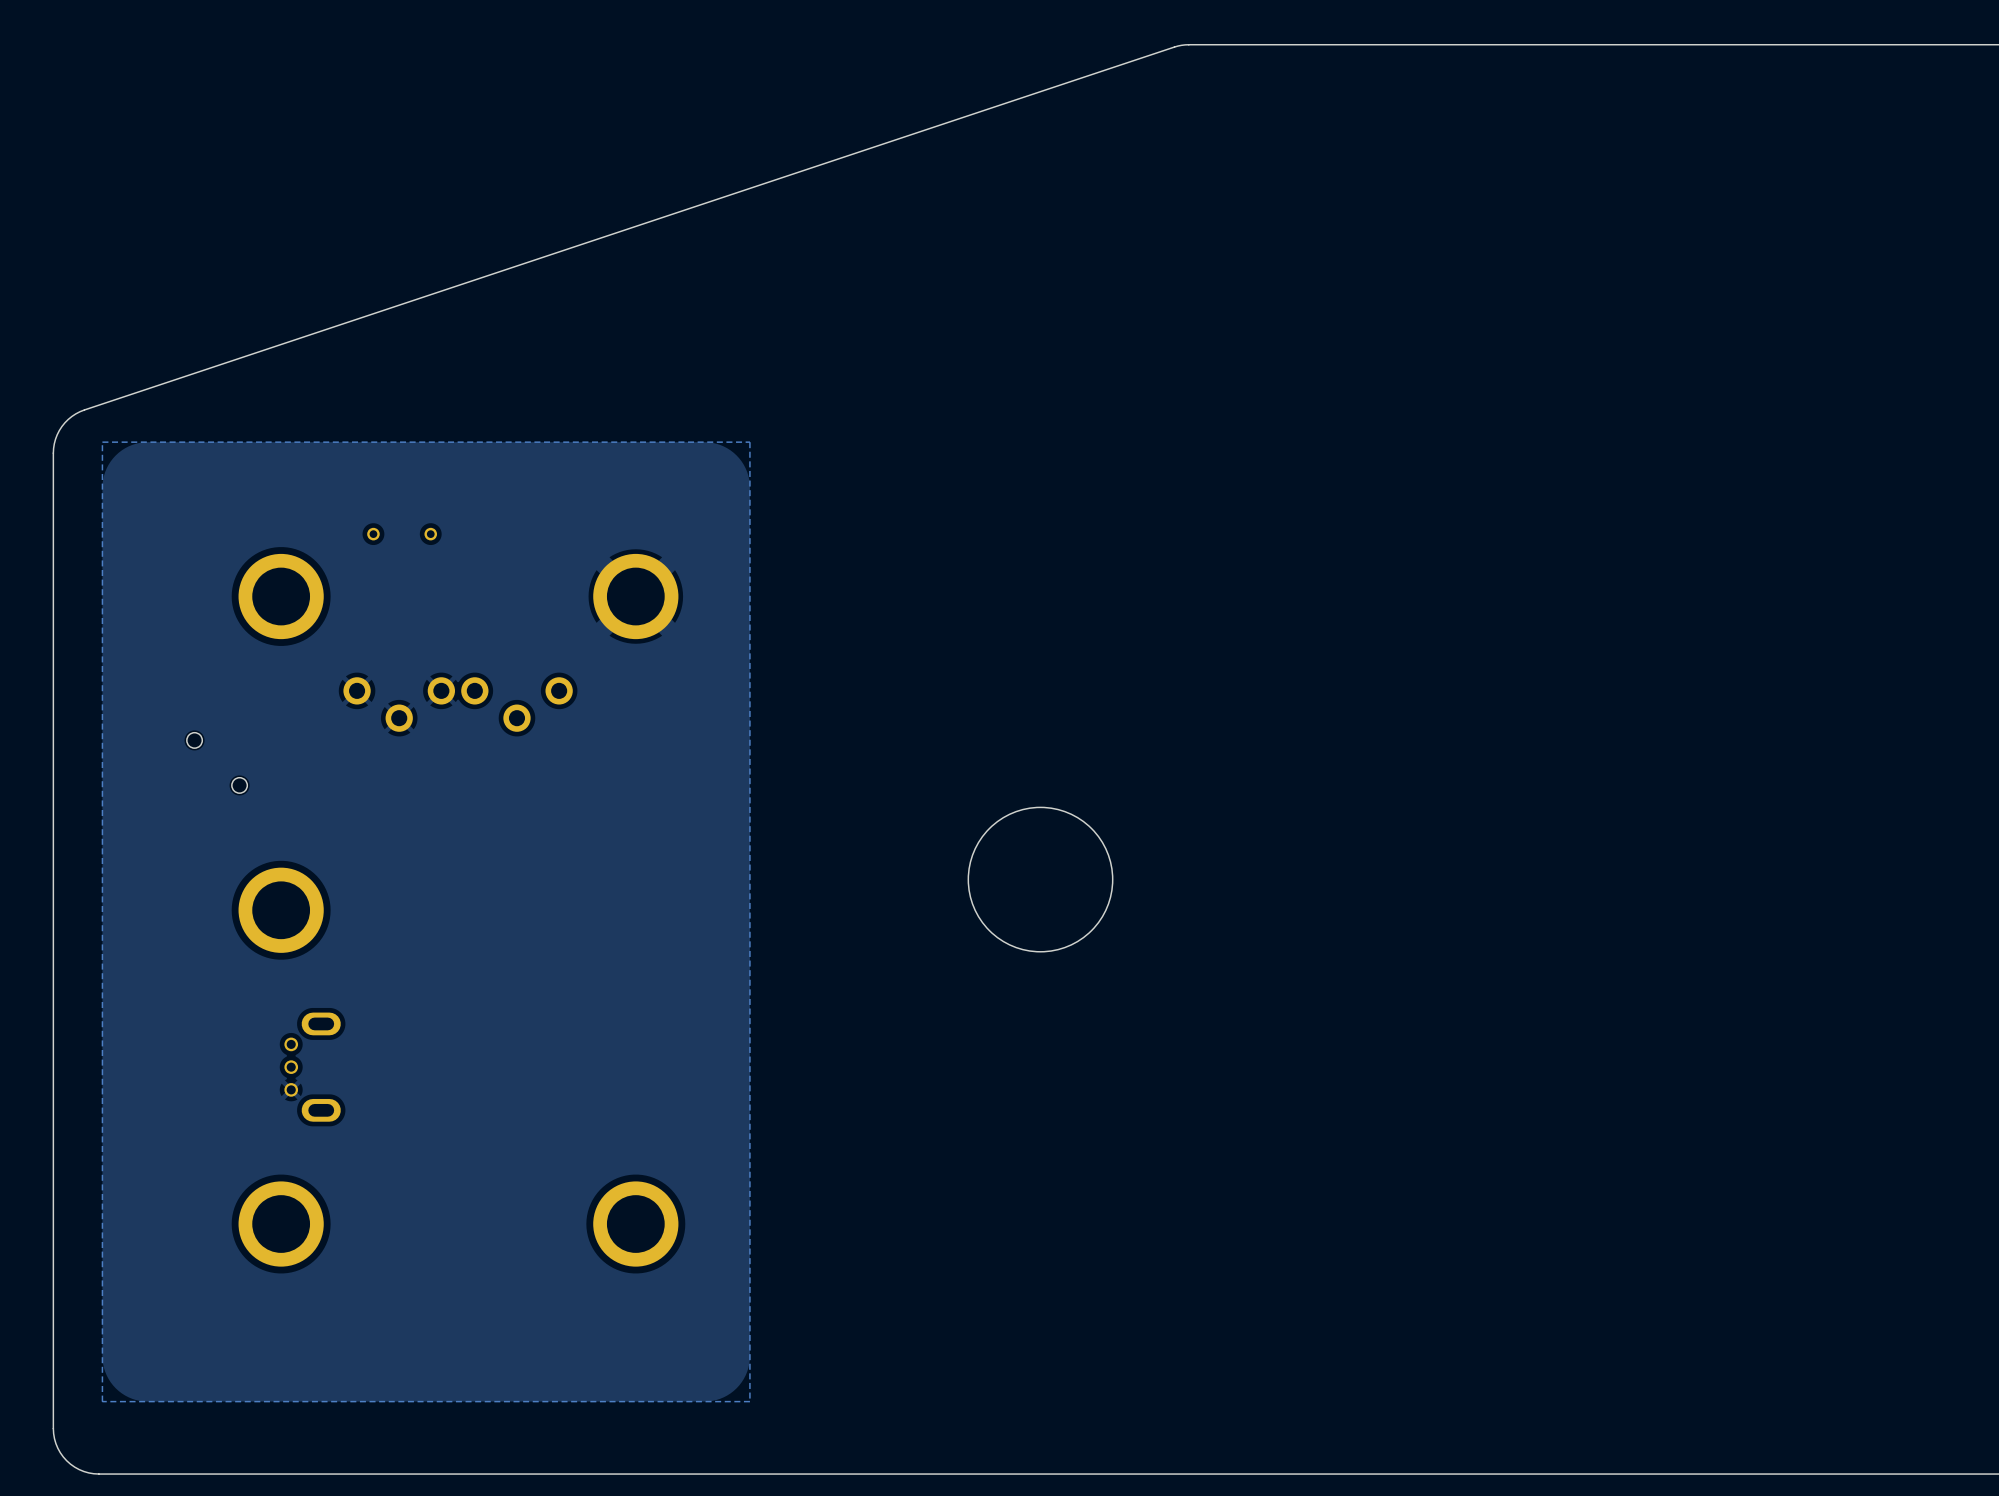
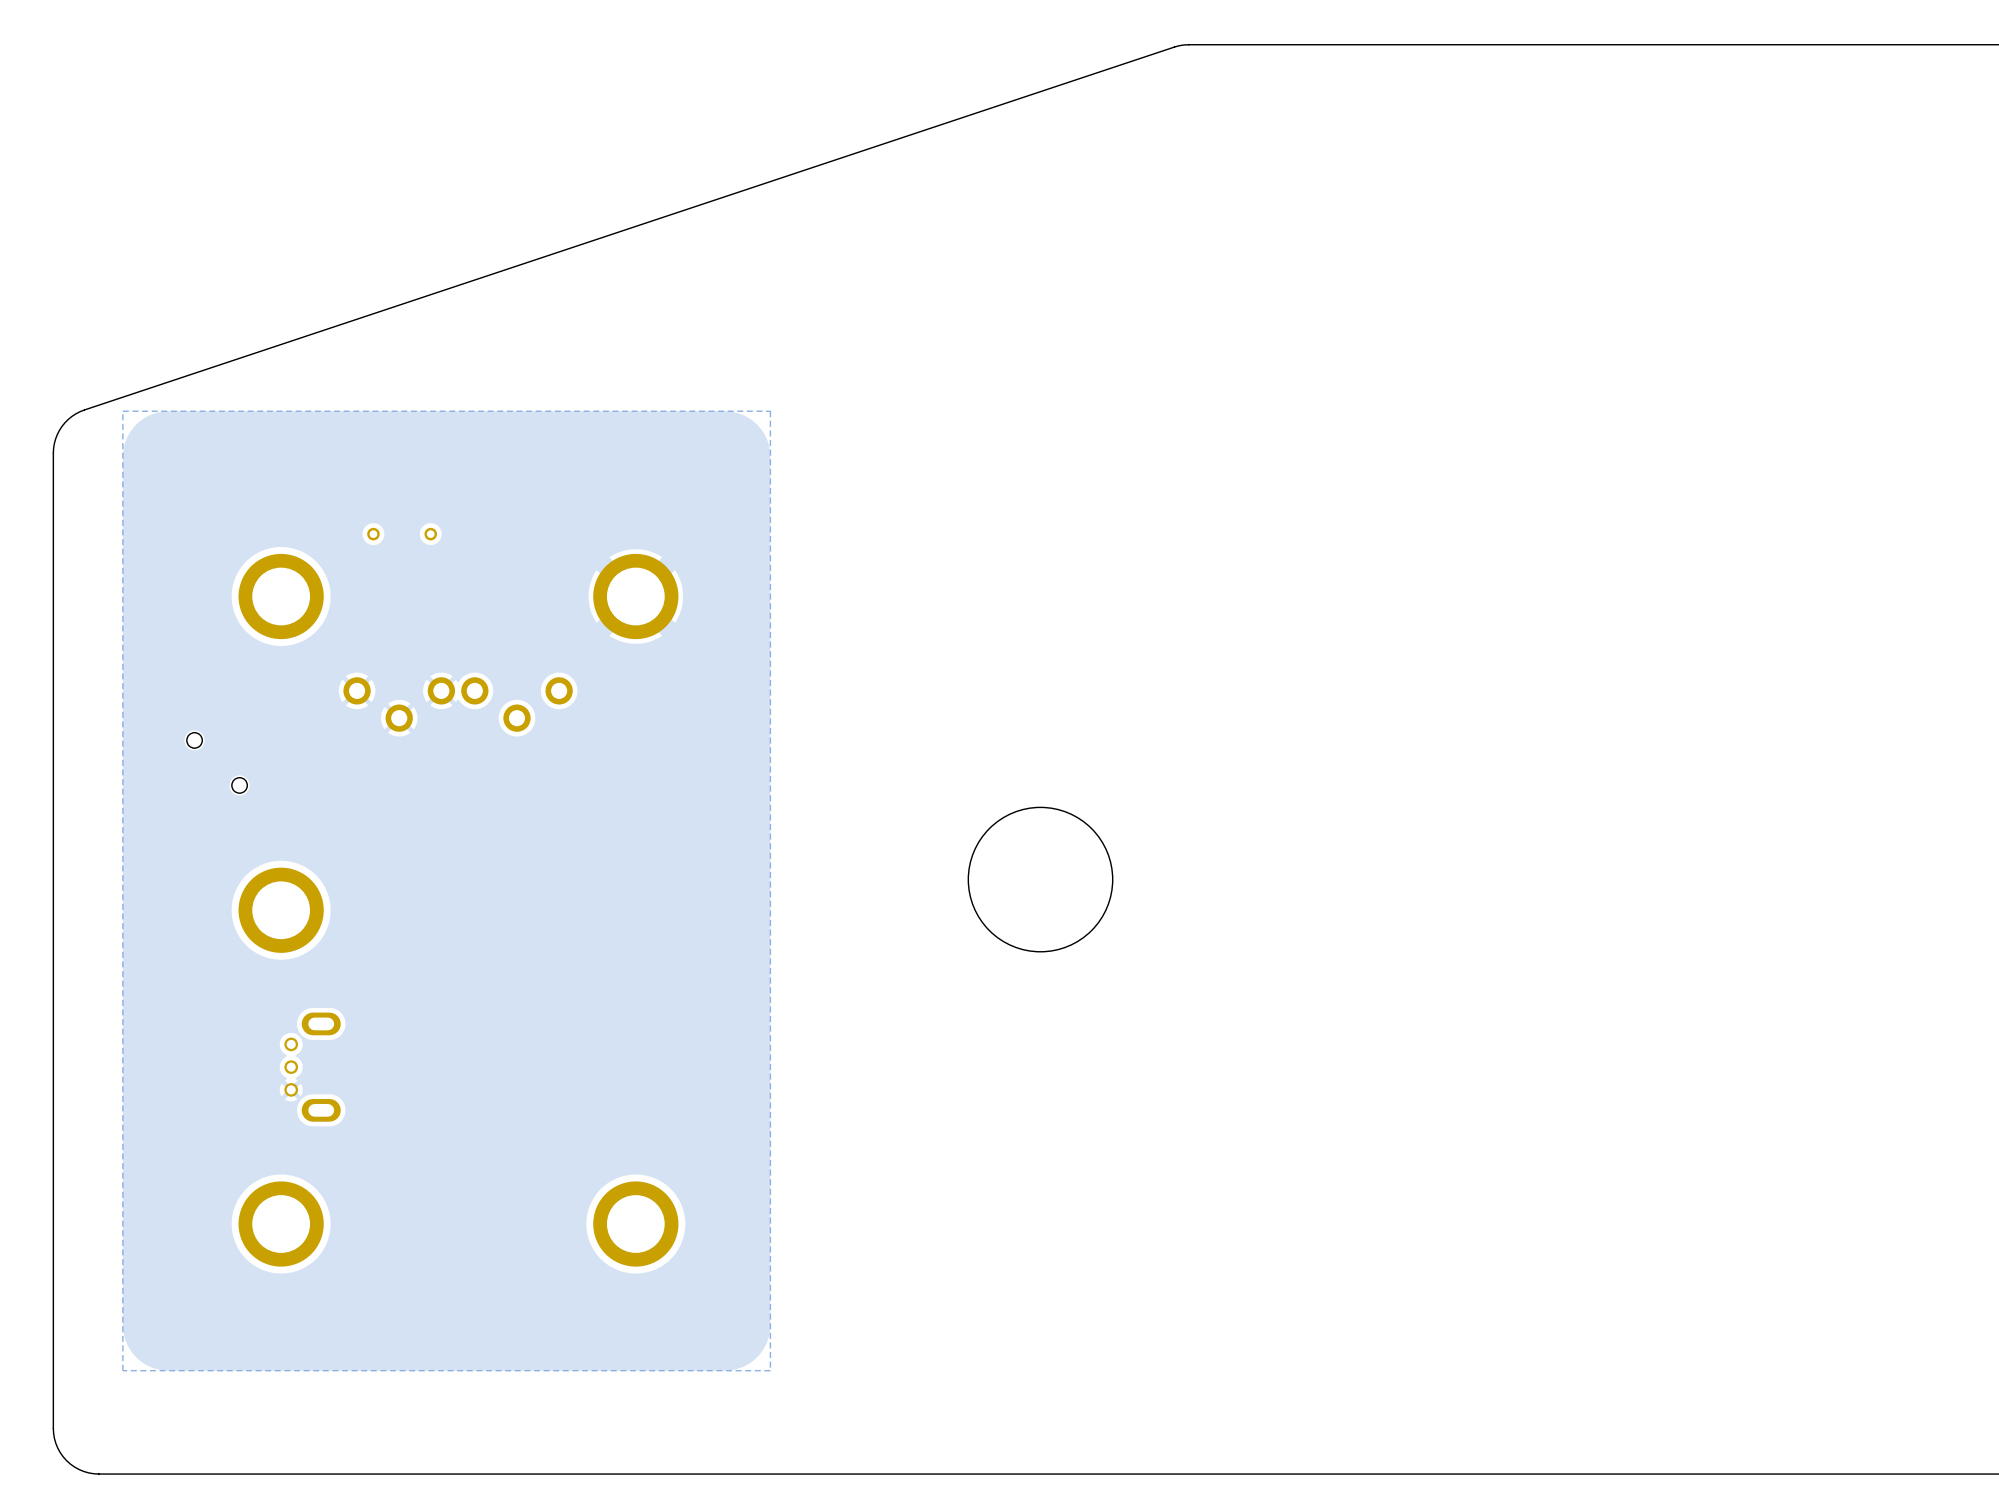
zone outline: (749, 442) (102, 442) (102, 1401) (749, 1401) (749, 442) -> (770, 411) (122, 411) (122, 1370) (770, 1370) (770, 411)

